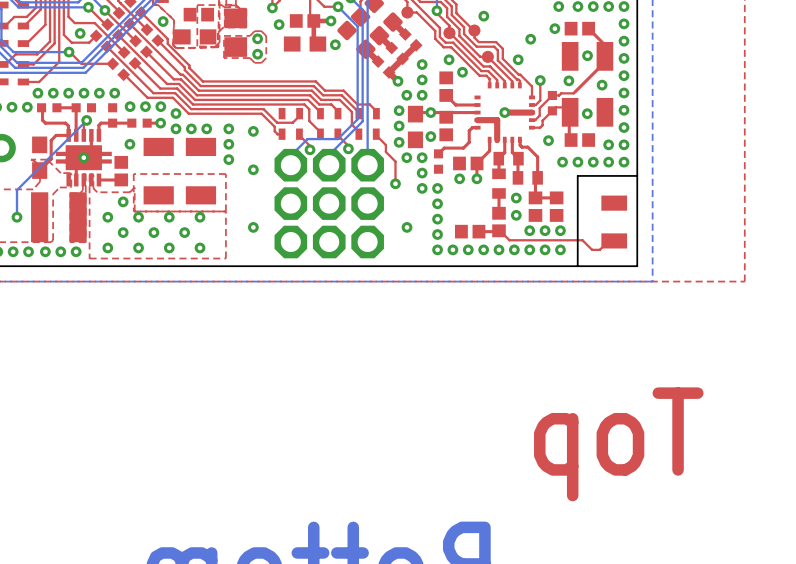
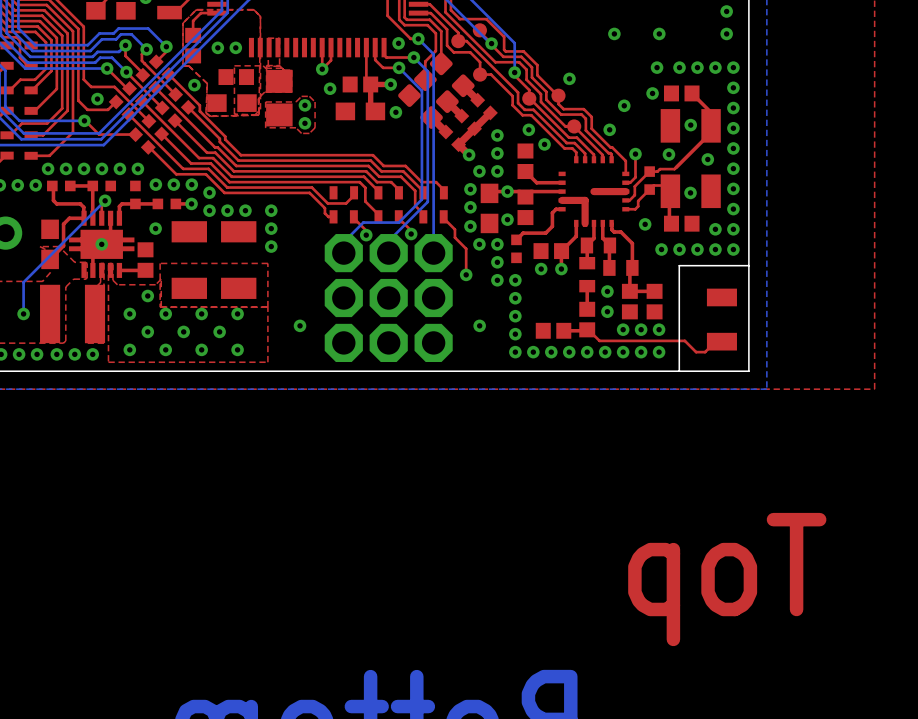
via: (504, 112) -> none
via: (253, 131) -> none
via: (253, 169) -> none

